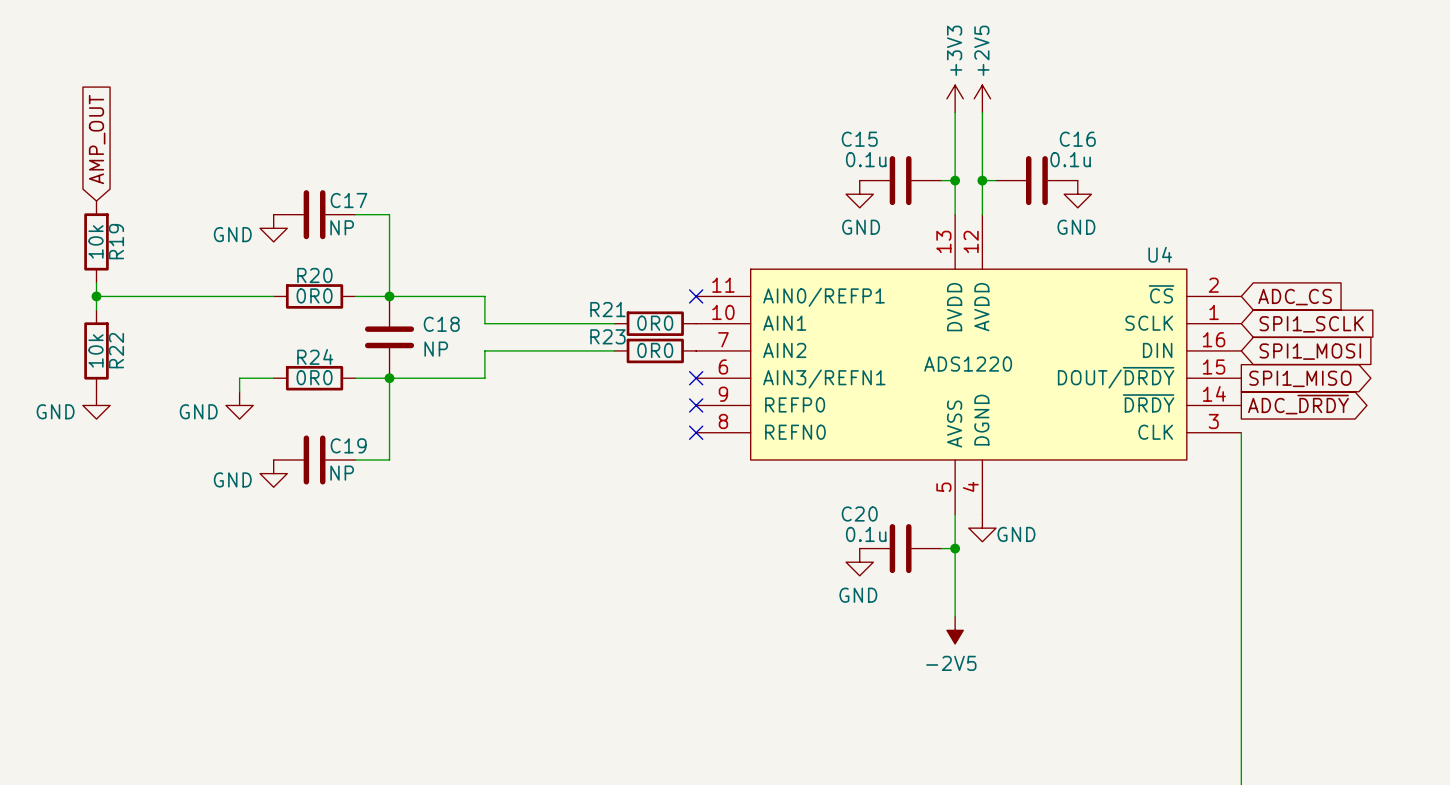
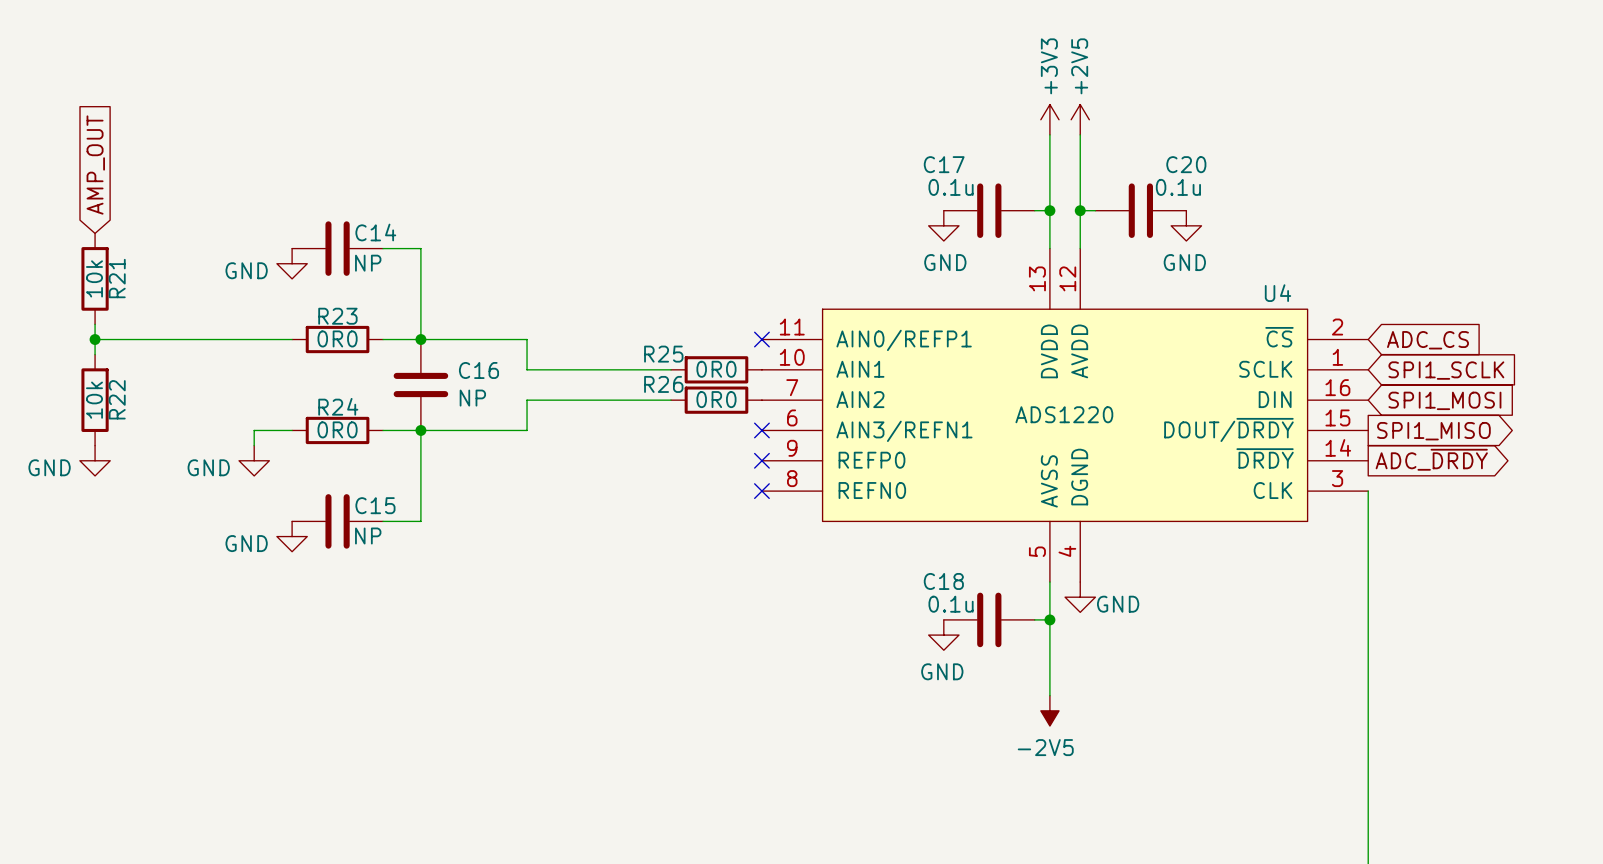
C15 name: C15 (859, 139) -> C17 (944, 164)
C16 name: C16 (1077, 139) -> C20 (1186, 164)
C17 name: C17 (348, 200) -> C14 (375, 232)
R19 name: R19 (116, 241) -> R21 (117, 278)
R20 name: R20 (314, 275) -> R23 (337, 316)
R21 name: R21 (607, 309) -> R25 (663, 354)
C18 name: C18 (441, 324) -> C16 (478, 370)
R23 name: R23 (607, 336) -> R26 (663, 384)
C19 name: C19 (348, 445) -> C15 (375, 505)
C20 name: C20 (859, 514) -> C18 (943, 581)

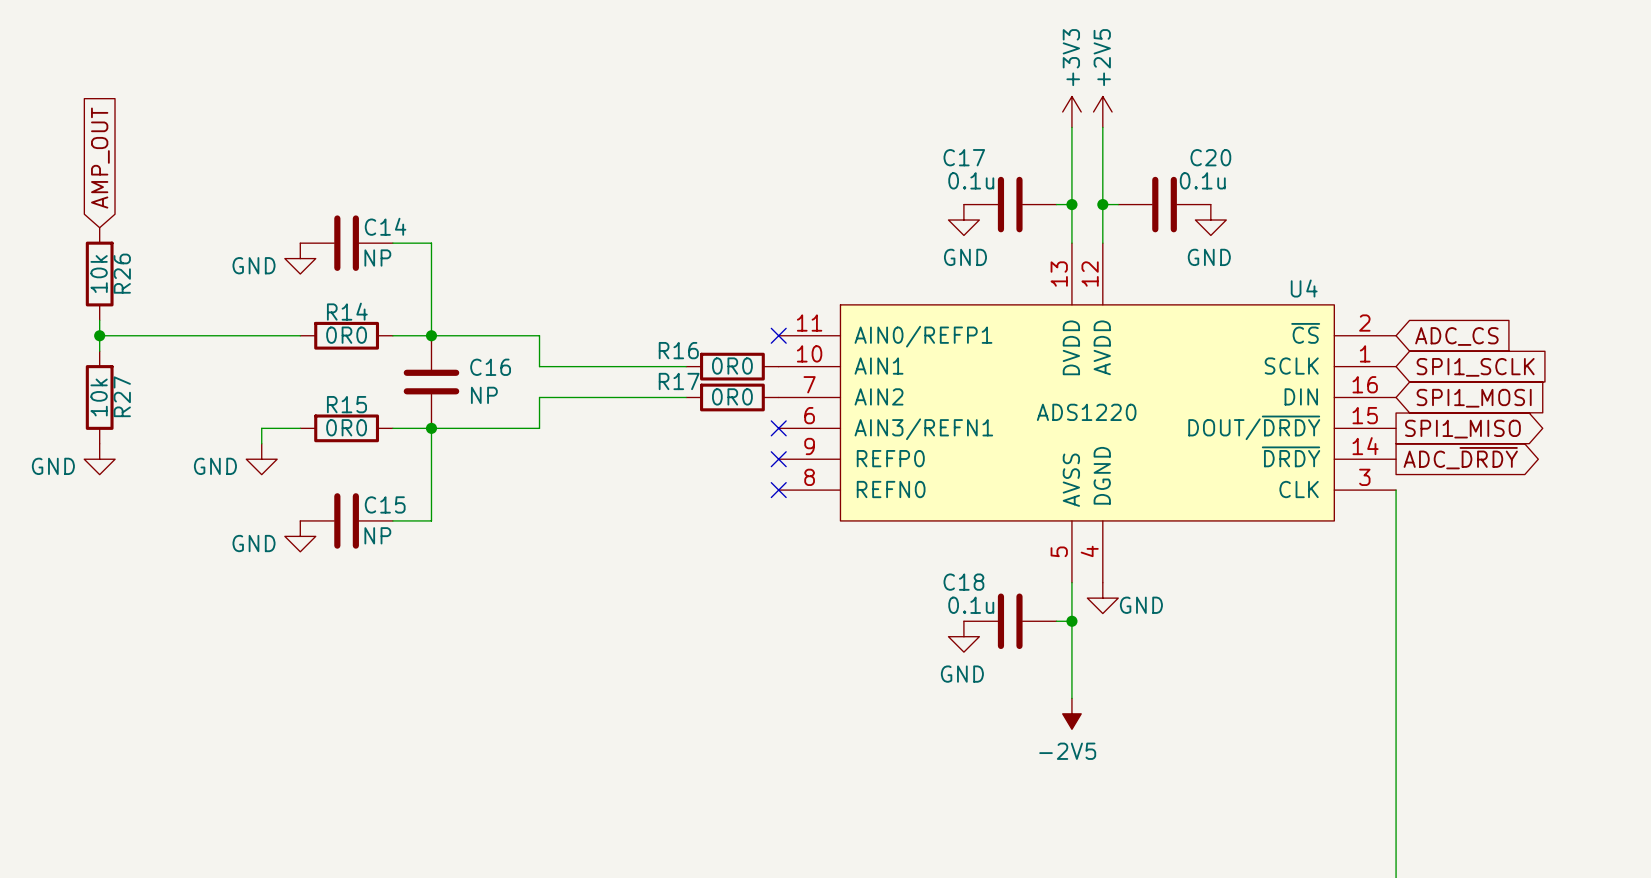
R21 name: R21 (117, 278) -> R26 (122, 273)
R23 name: R23 (337, 316) -> R14 (347, 311)
R25 name: R25 (663, 354) -> R16 (678, 350)
R26 name: R26 (663, 384) -> R17 (679, 381)
R22 name: R22 (117, 399) -> R27 (122, 396)
R24 name: R24 (338, 406) -> R15 (346, 404)

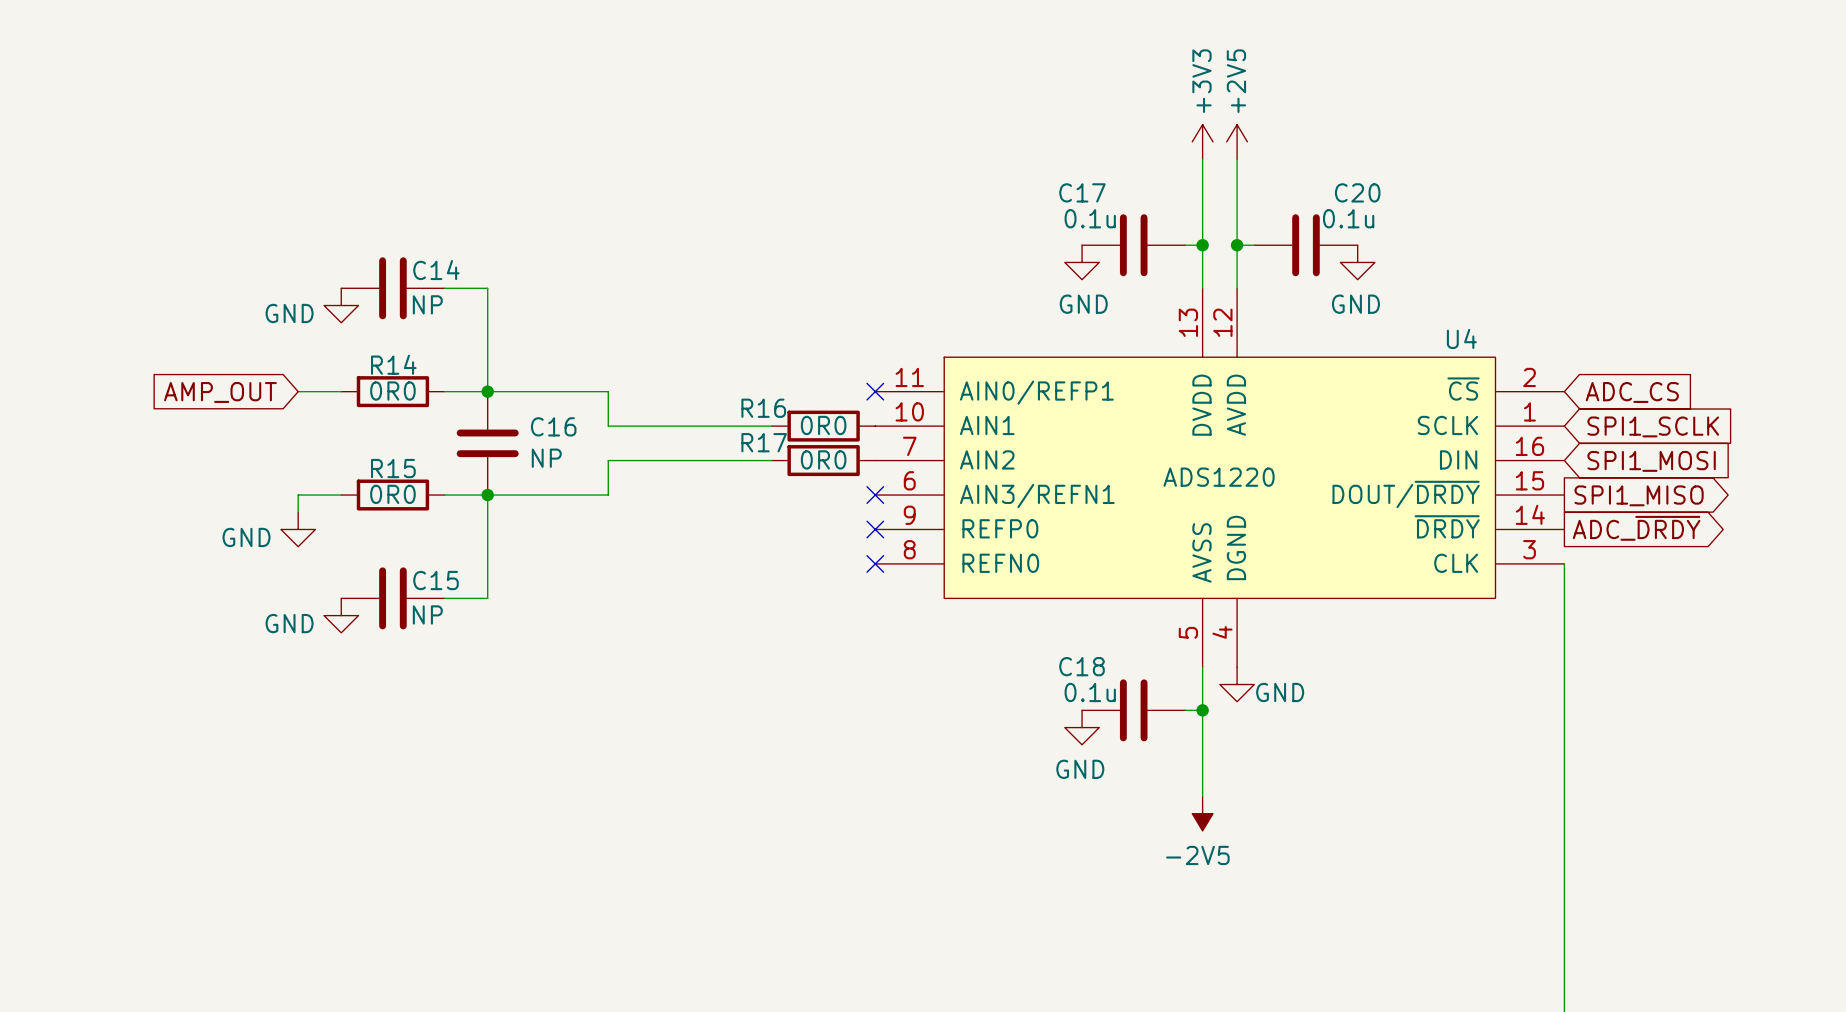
global label rotation: 0° (100, 158) -> 90° counterclockwise (220, 392)
global label position: AMP_OUT (100, 158) -> AMP_OUT (220, 392)
R26: 10k (99, 274) -> none
wire: (99, 320) (99, 351) -> none
wire: (99, 335) (261, 335) -> none
junction: (99, 335) -> none
R27: 10k (99, 397) -> none
power symbol: GND (99, 459) -> none

